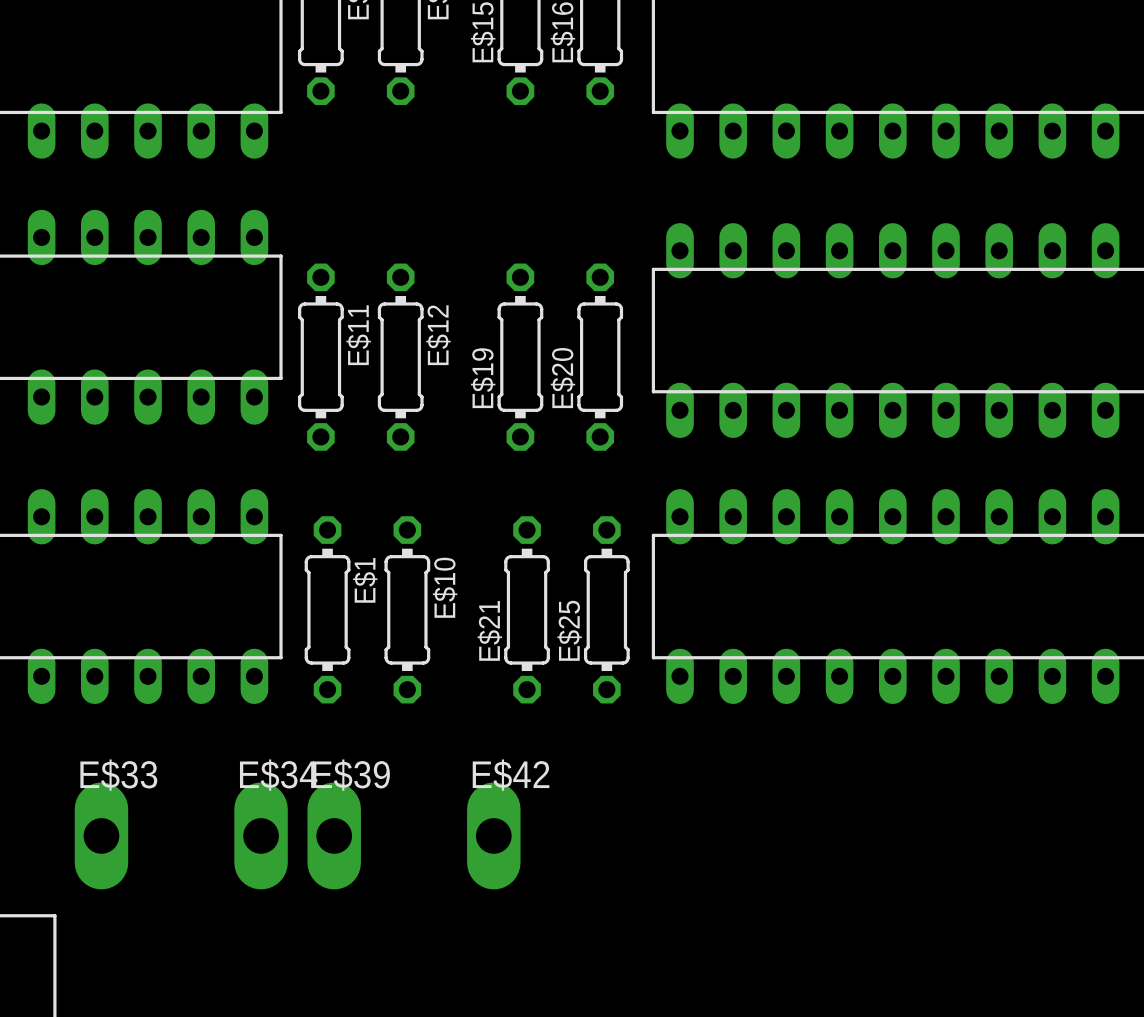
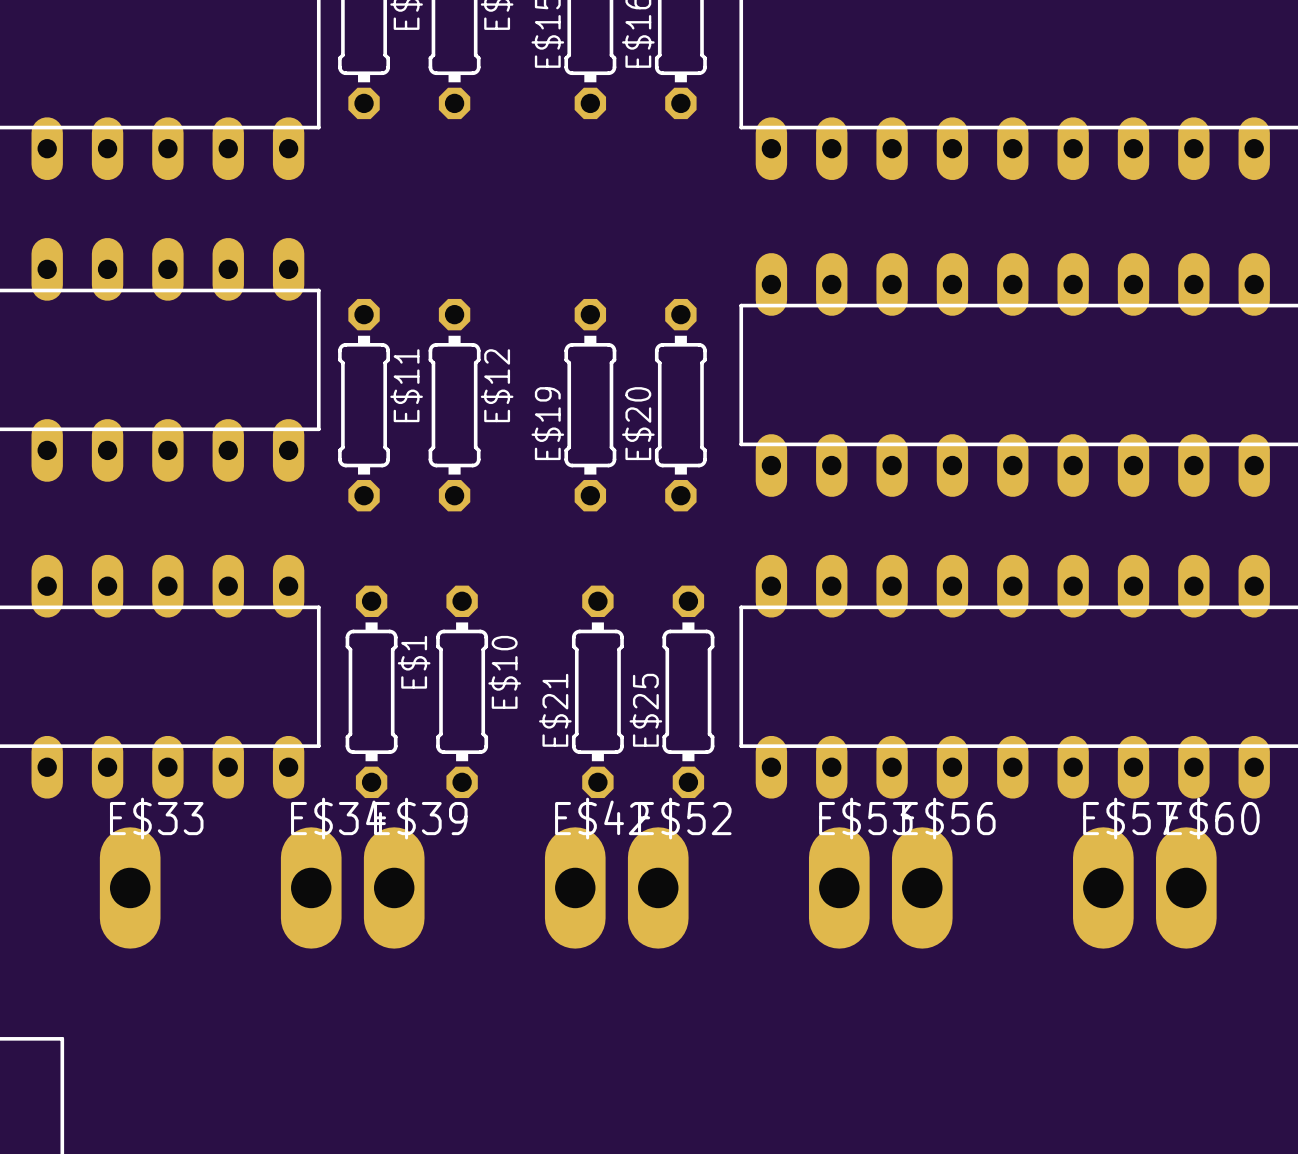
E$52: none -> (658, 887)
E$53: none -> (839, 887)
E$56: none -> (922, 887)
E$57: none -> (1103, 887)
E$60: none -> (1186, 887)
E$33 position: (101, 835) -> (130, 887)
E$34 position: (261, 835) -> (311, 887)
E$39 position: (334, 835) -> (394, 887)
E$42 position: (493, 835) -> (575, 887)

